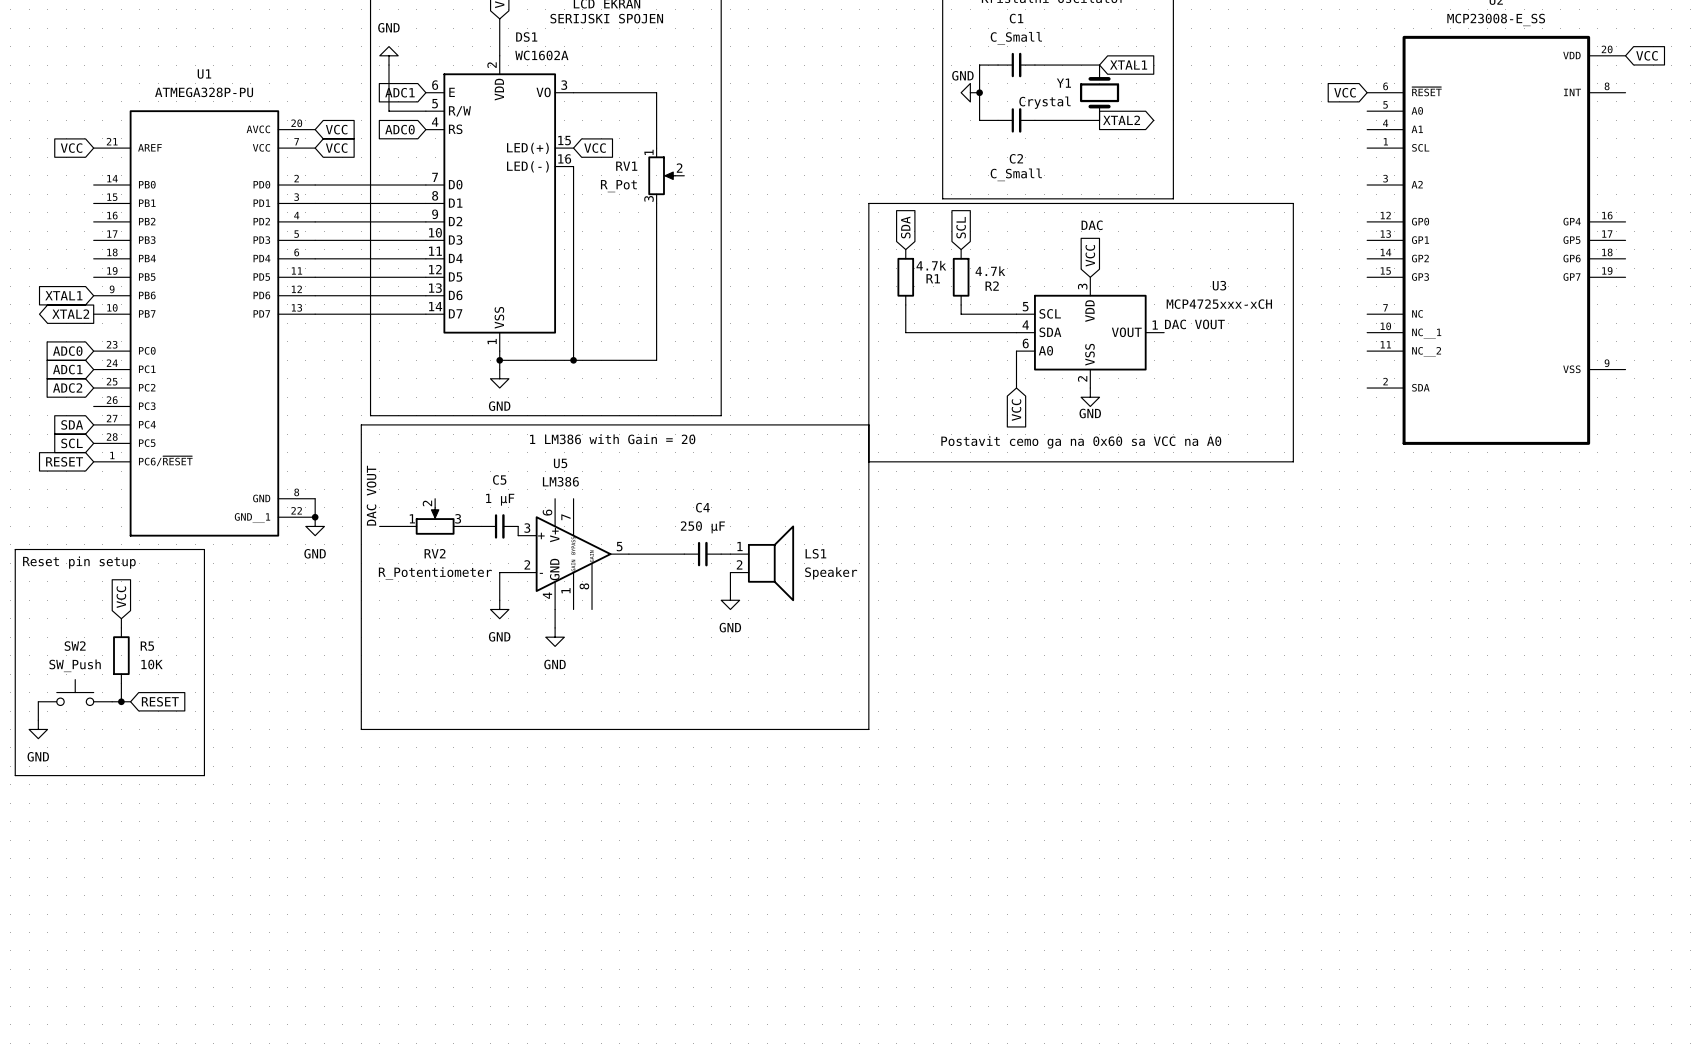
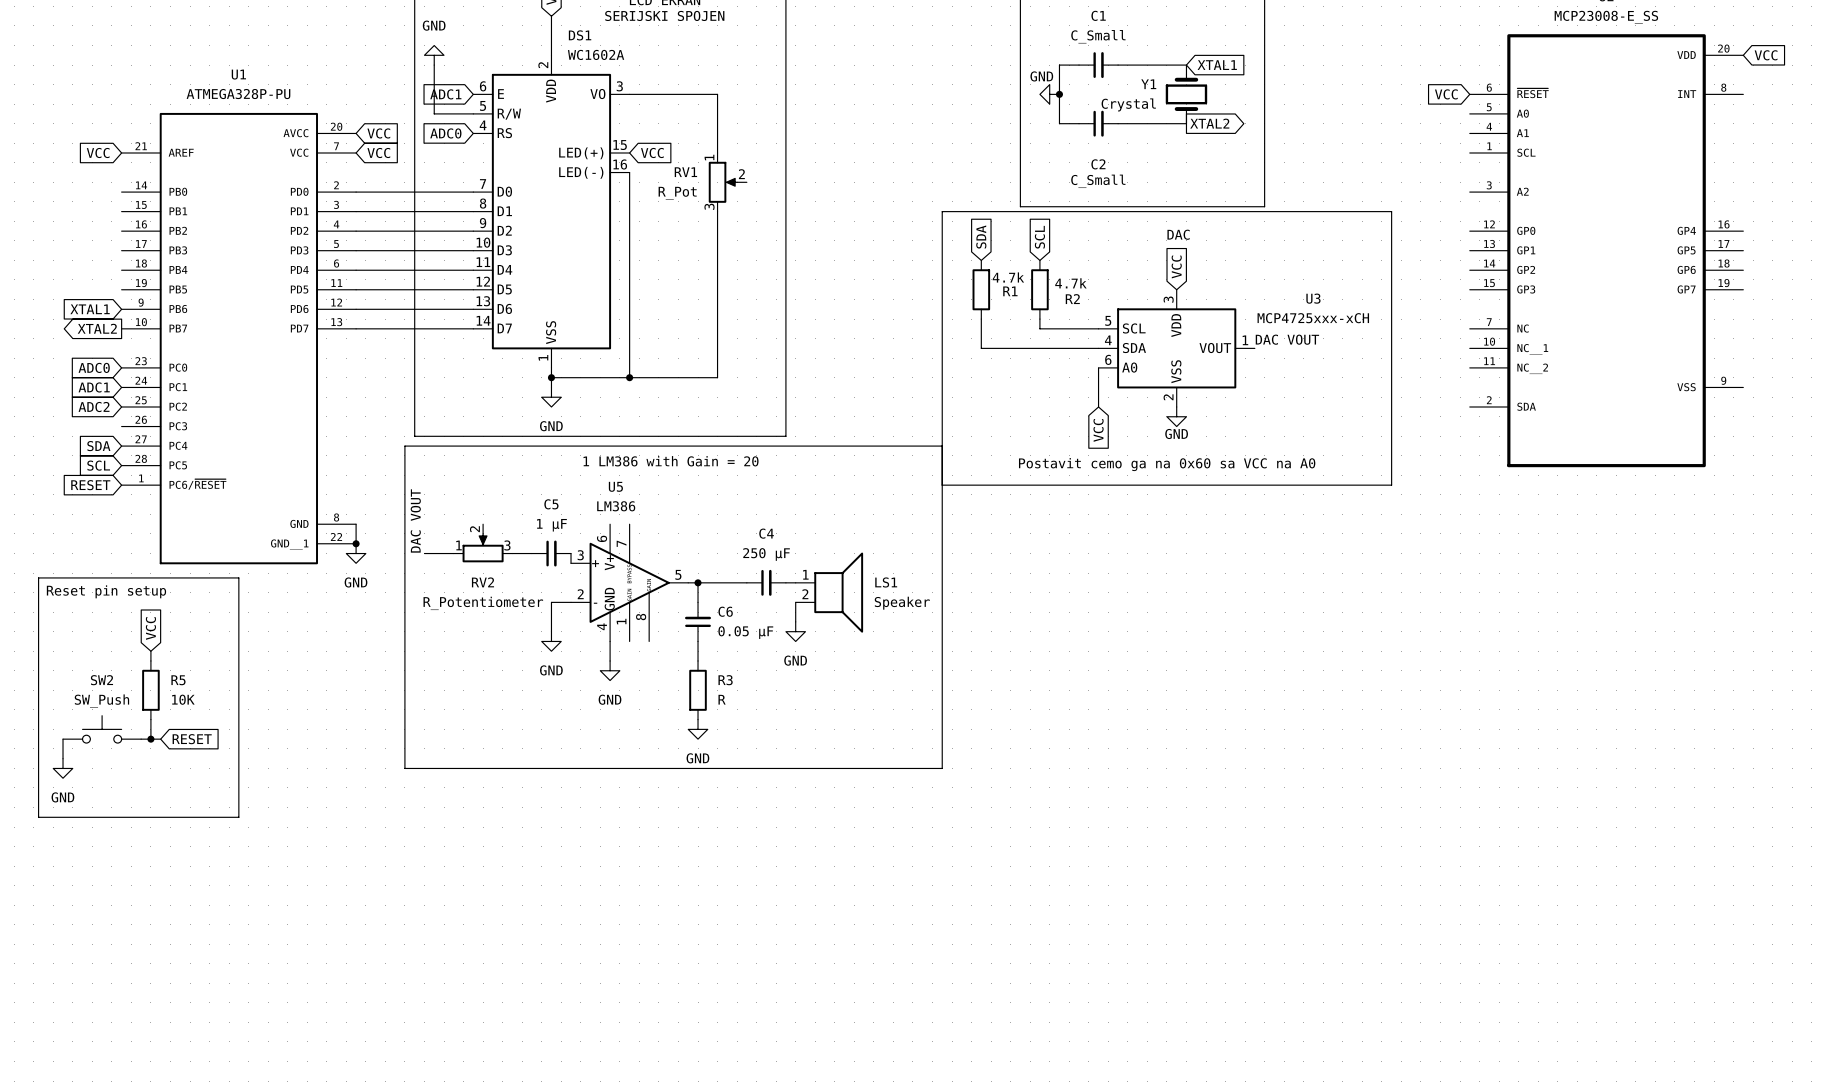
wire: none -> (698, 582) (698, 602)
junction: none -> (698, 582)
C6: none -> 0.05 μF (698, 621)
wire: none -> (698, 641) (698, 660)
R3: none -> R (698, 690)
power symbol: none -> GND (698, 729)

